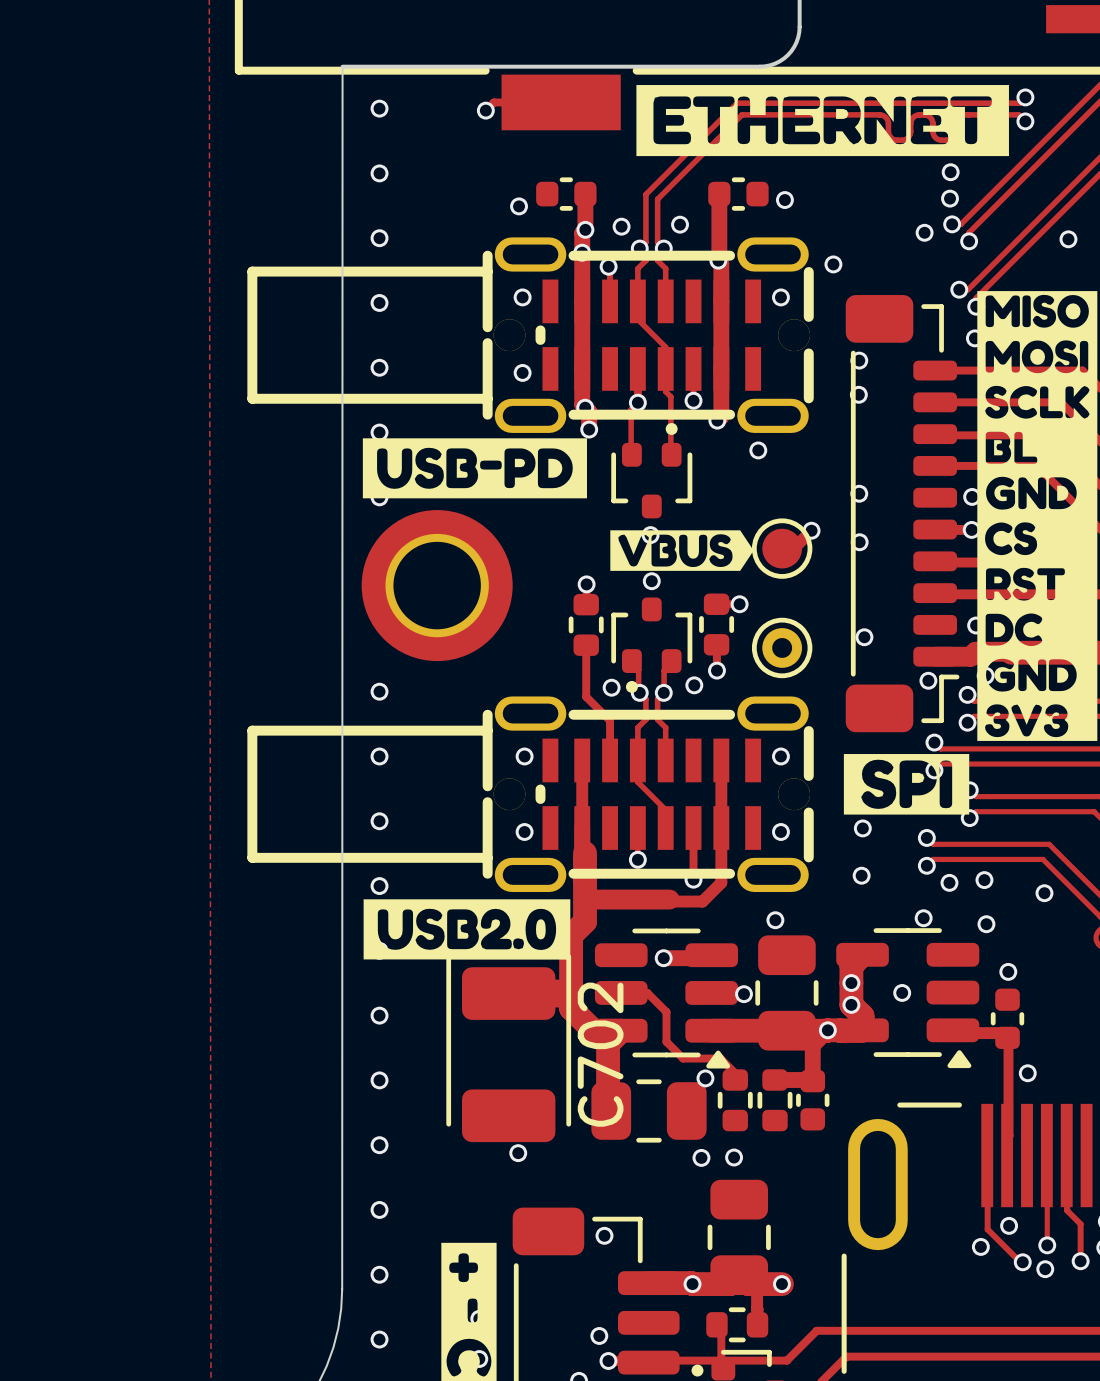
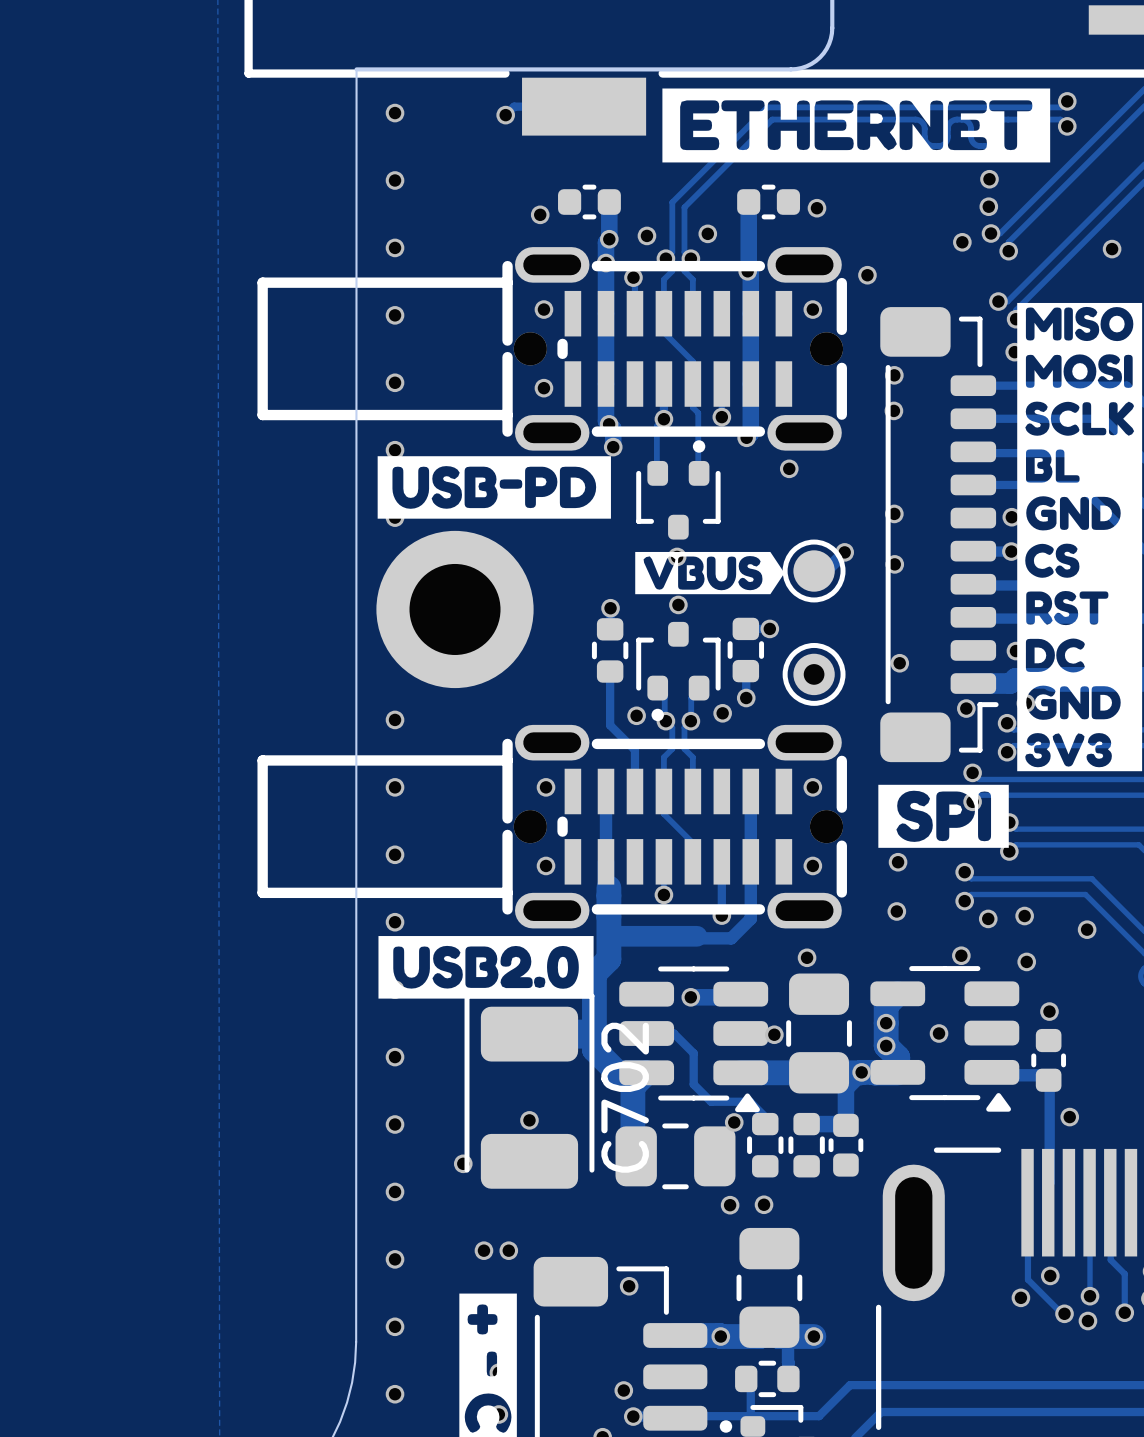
via: none -> (529, 1120)
via: none -> (463, 1163)
via: (518, 1153) -> none
via: none -> (483, 1250)
via: none -> (508, 1250)

